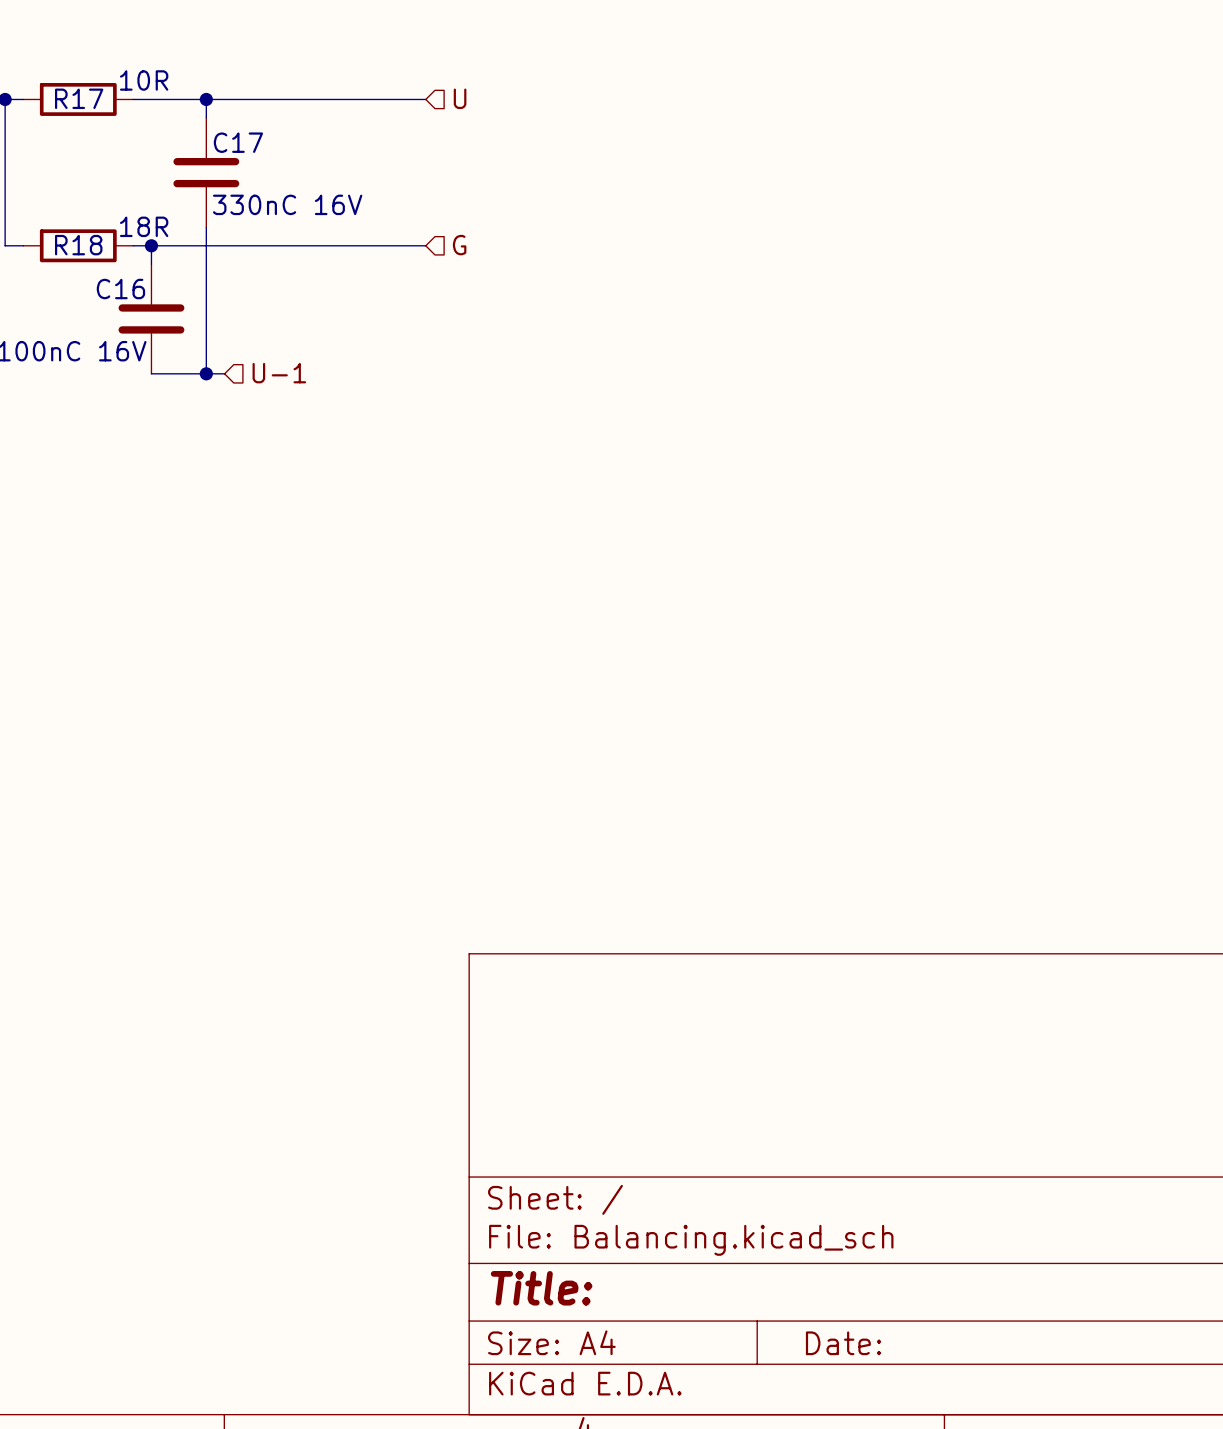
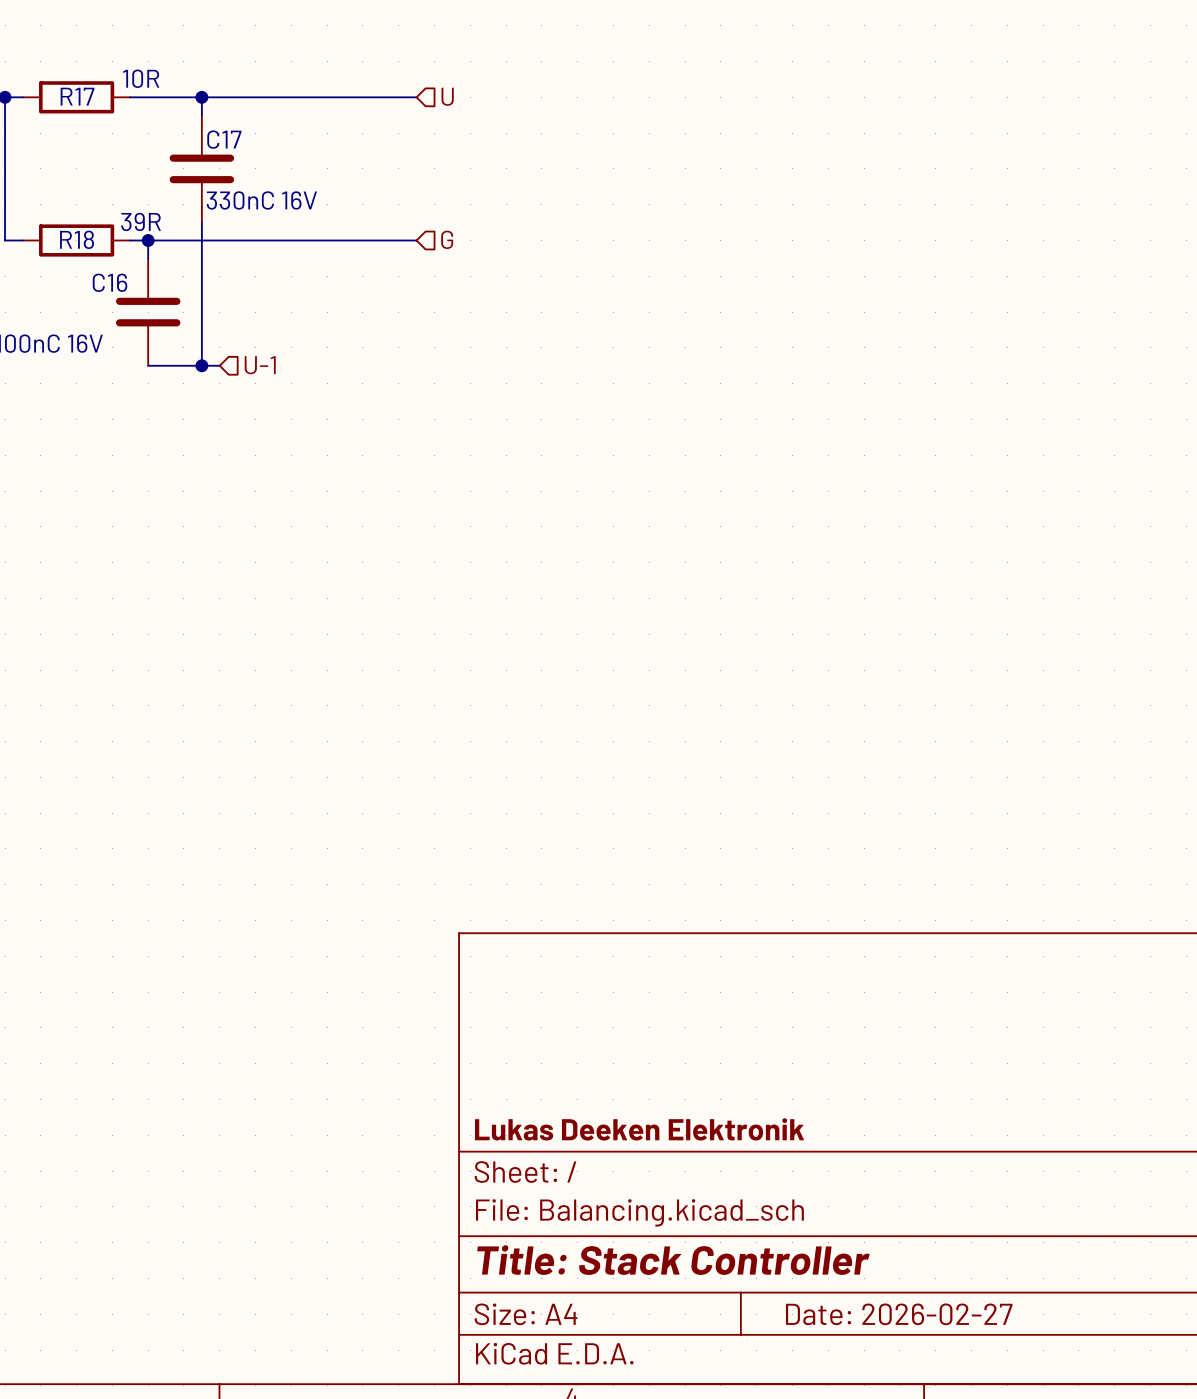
R18 value: 18R (144, 226) -> 39R (141, 221)
title block: none -> Lukas Deeken Elektronik (639, 1129)
title block: Title: (541, 1288) -> Title: Stack Controller (673, 1260)
title block: Date: (843, 1343) -> Date: 2026-02-27 (899, 1314)

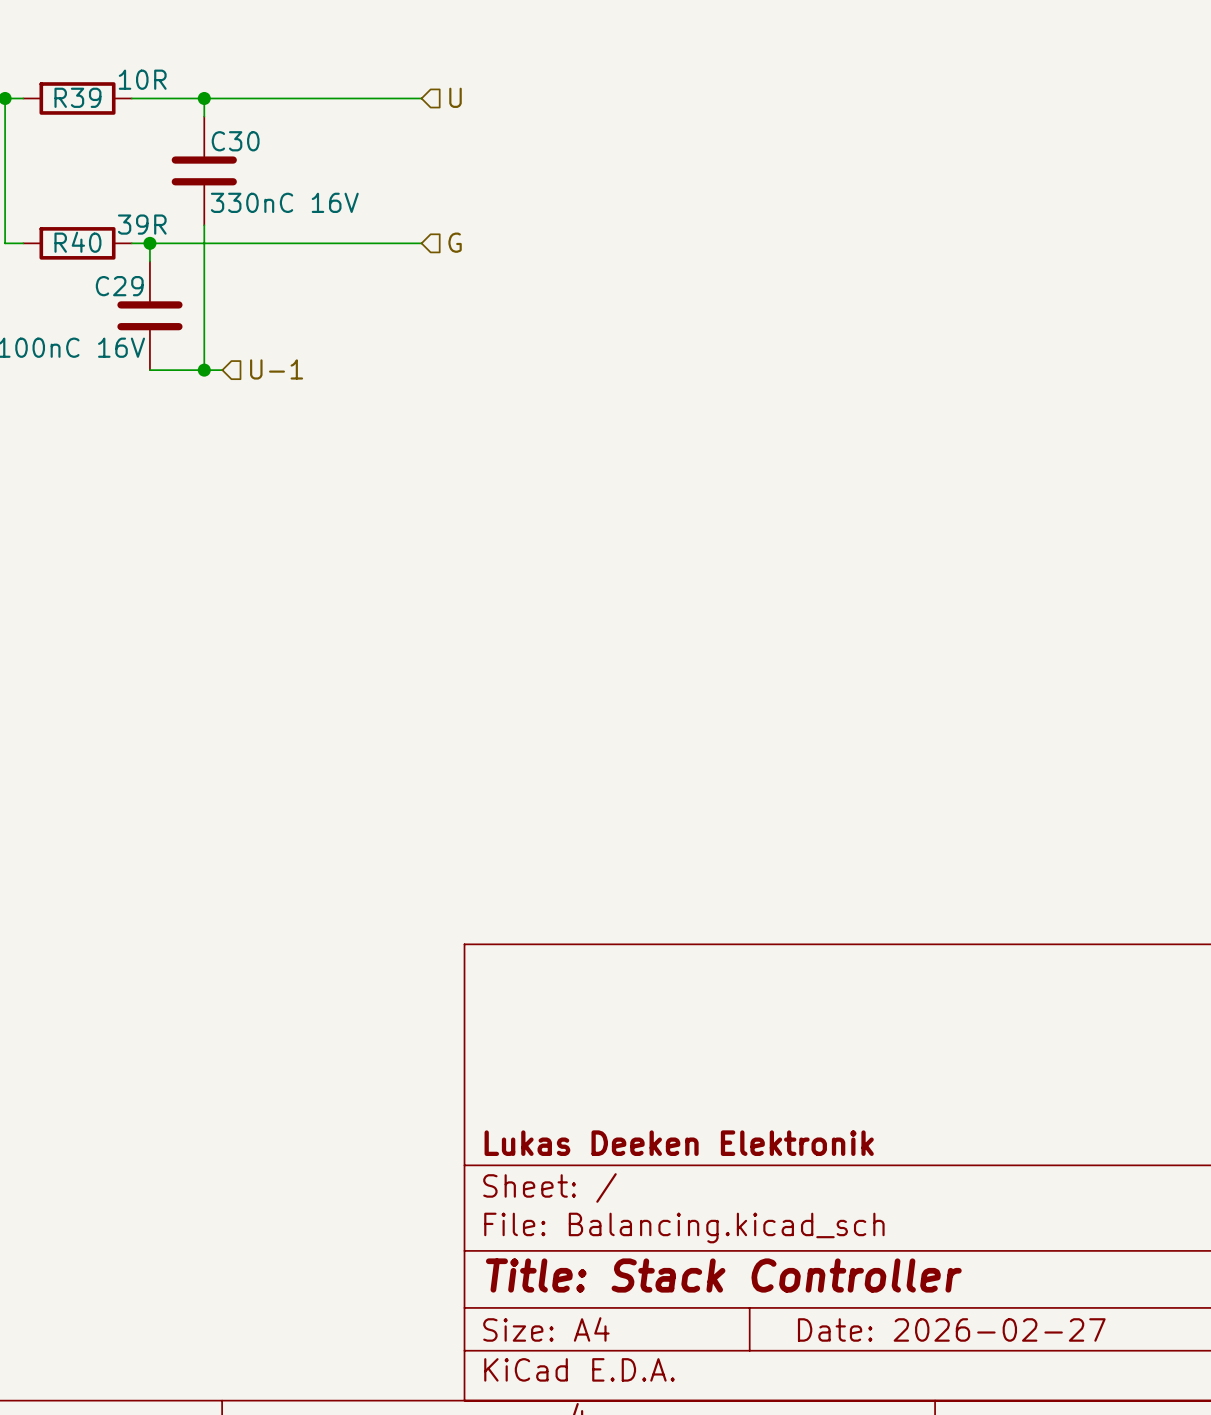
R17 name: R17 (77, 96) -> R39 (77, 97)
C17 name: C17 (224, 139) -> C30 (235, 141)
R18 name: R18 (77, 239) -> R40 (77, 242)
C16 name: C16 (110, 282) -> C29 (119, 286)

